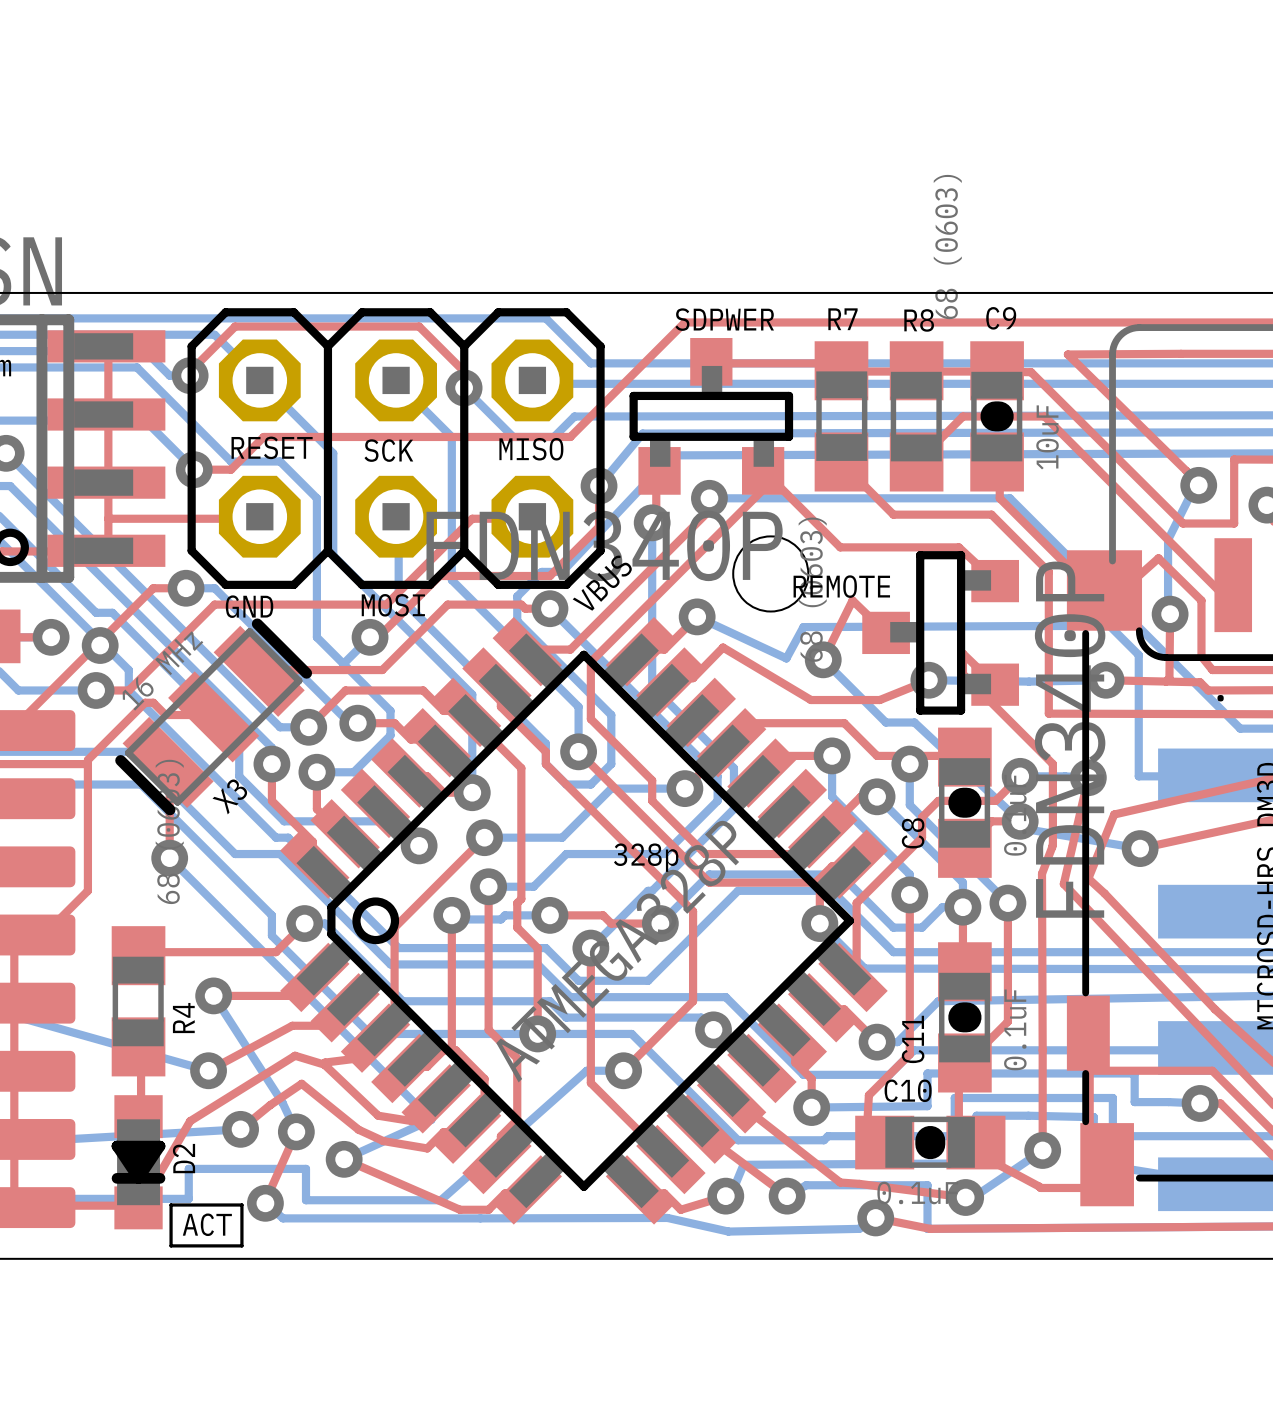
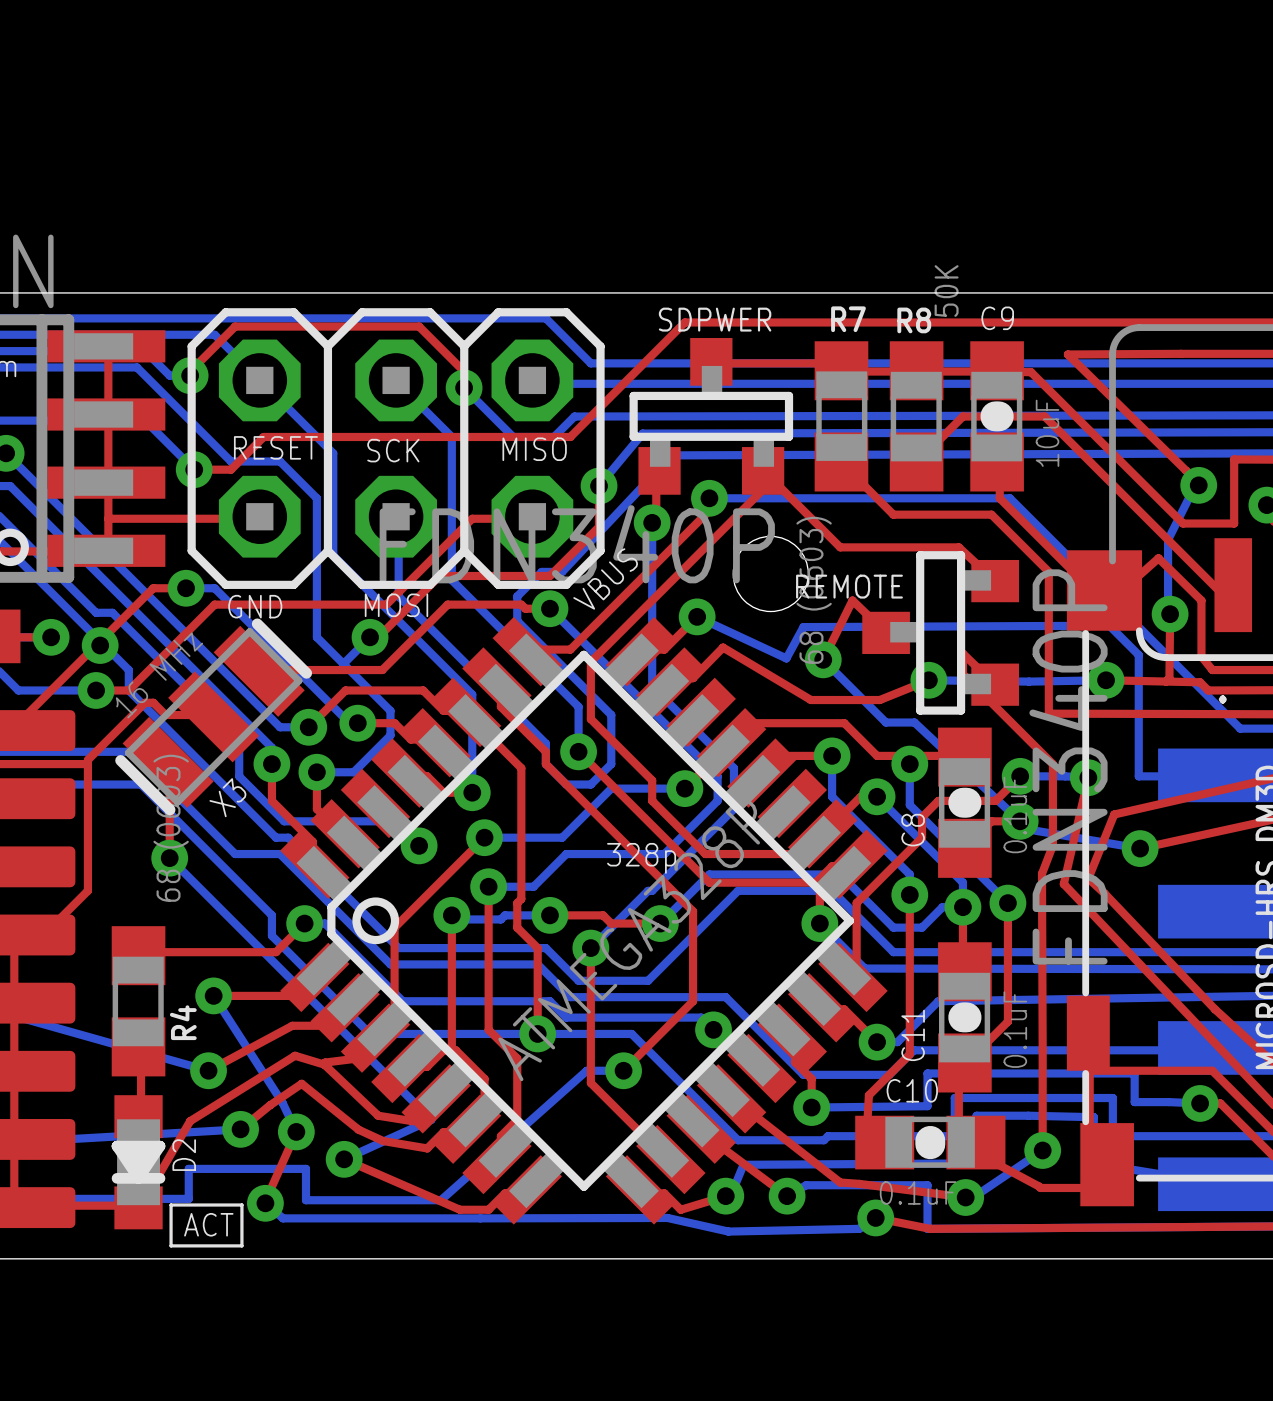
R8 value: 68 (0603) (947, 247) -> 50K (946, 291)

